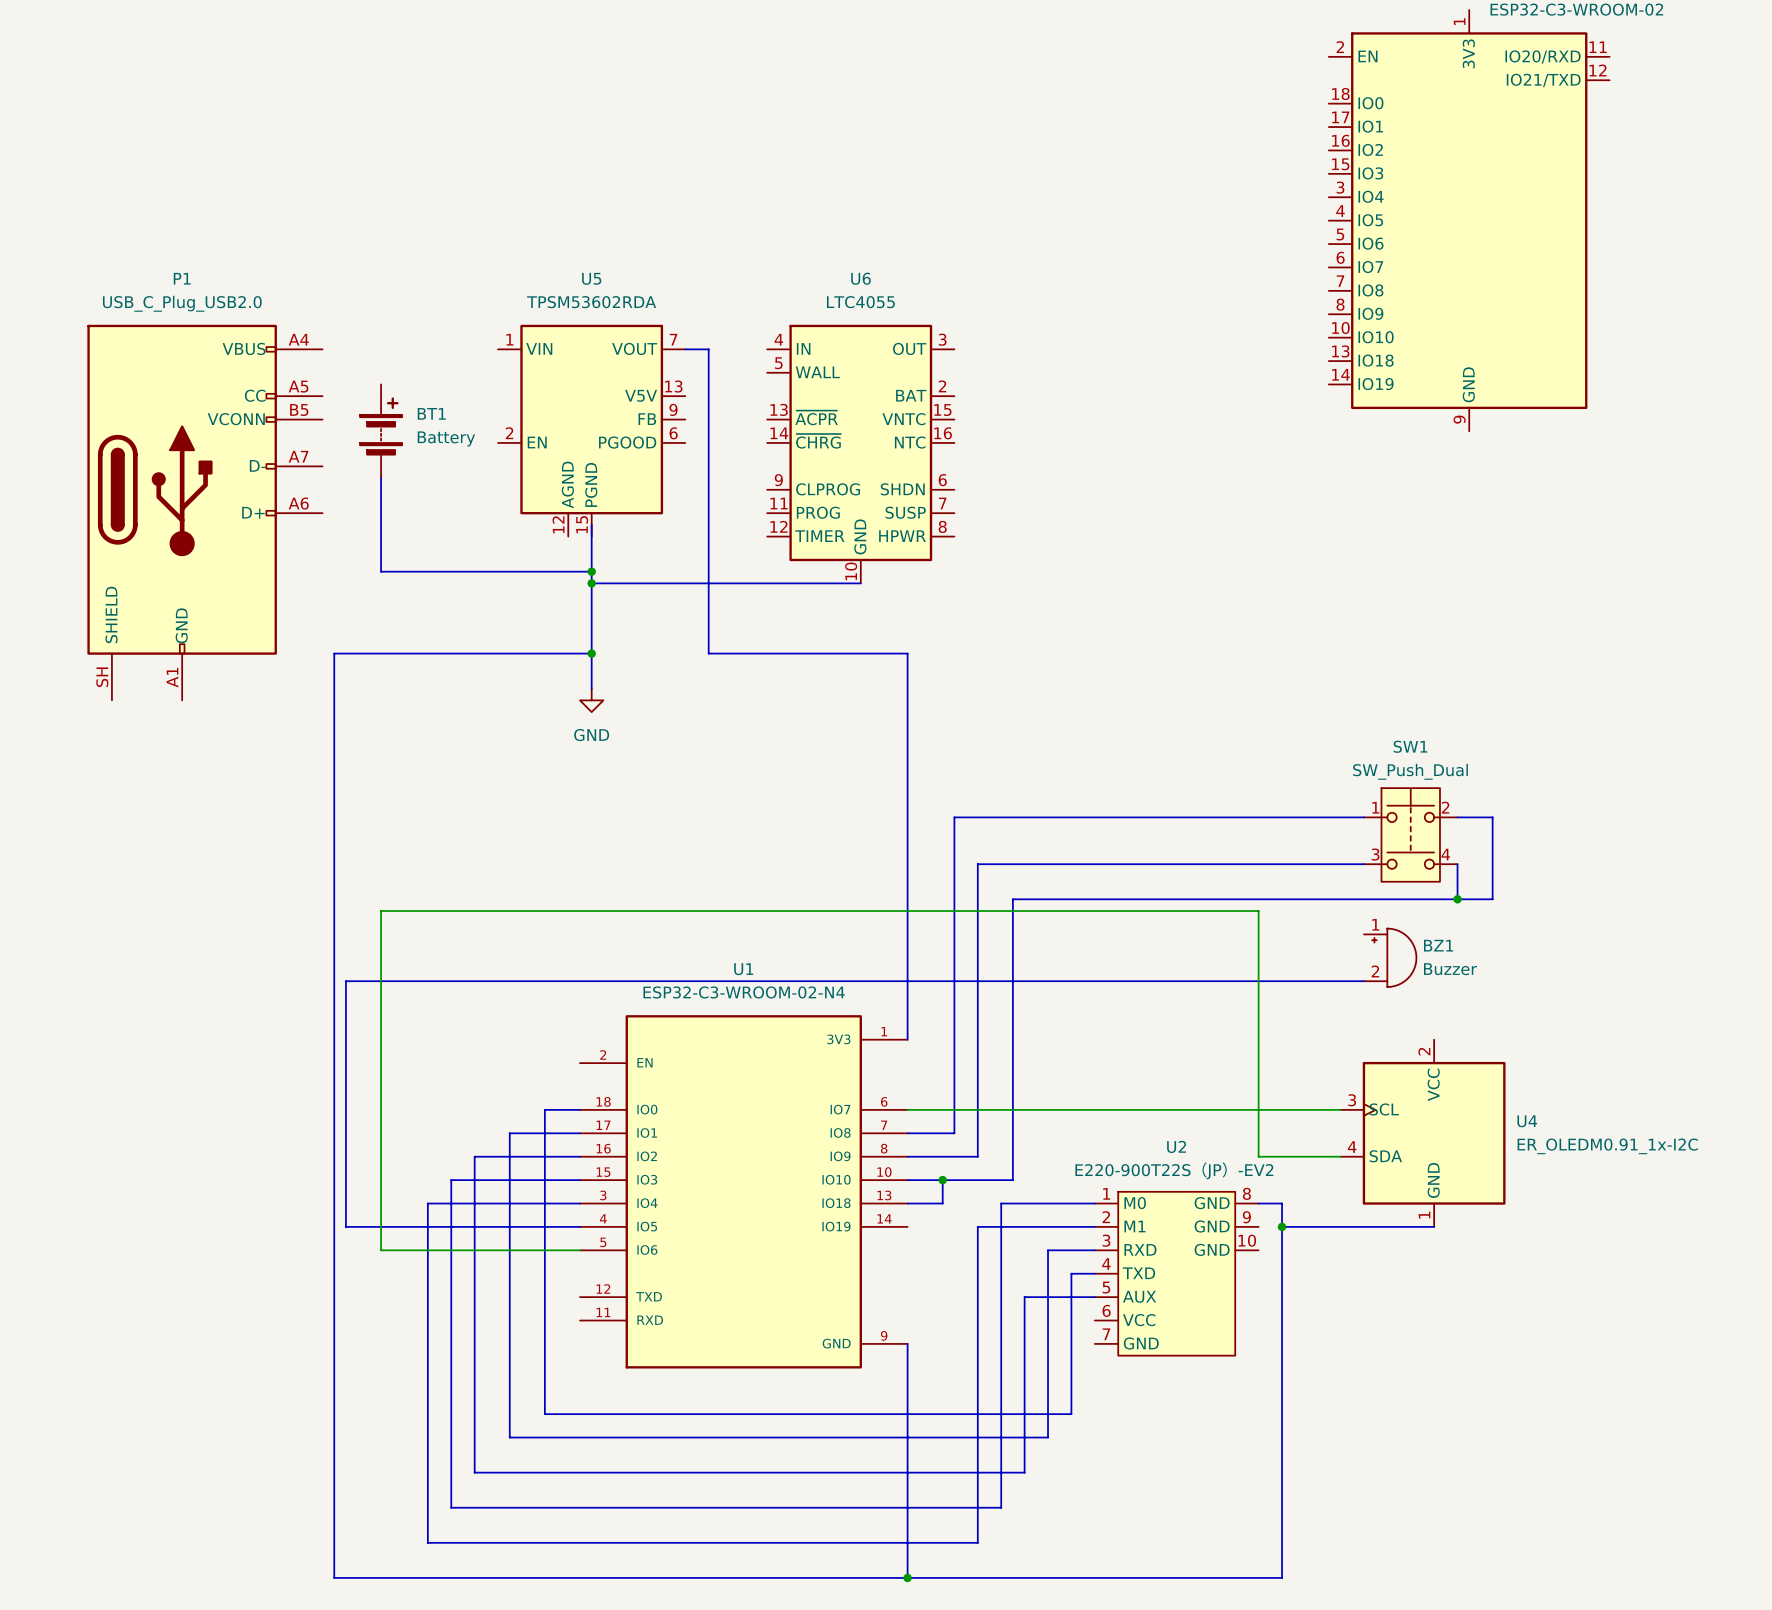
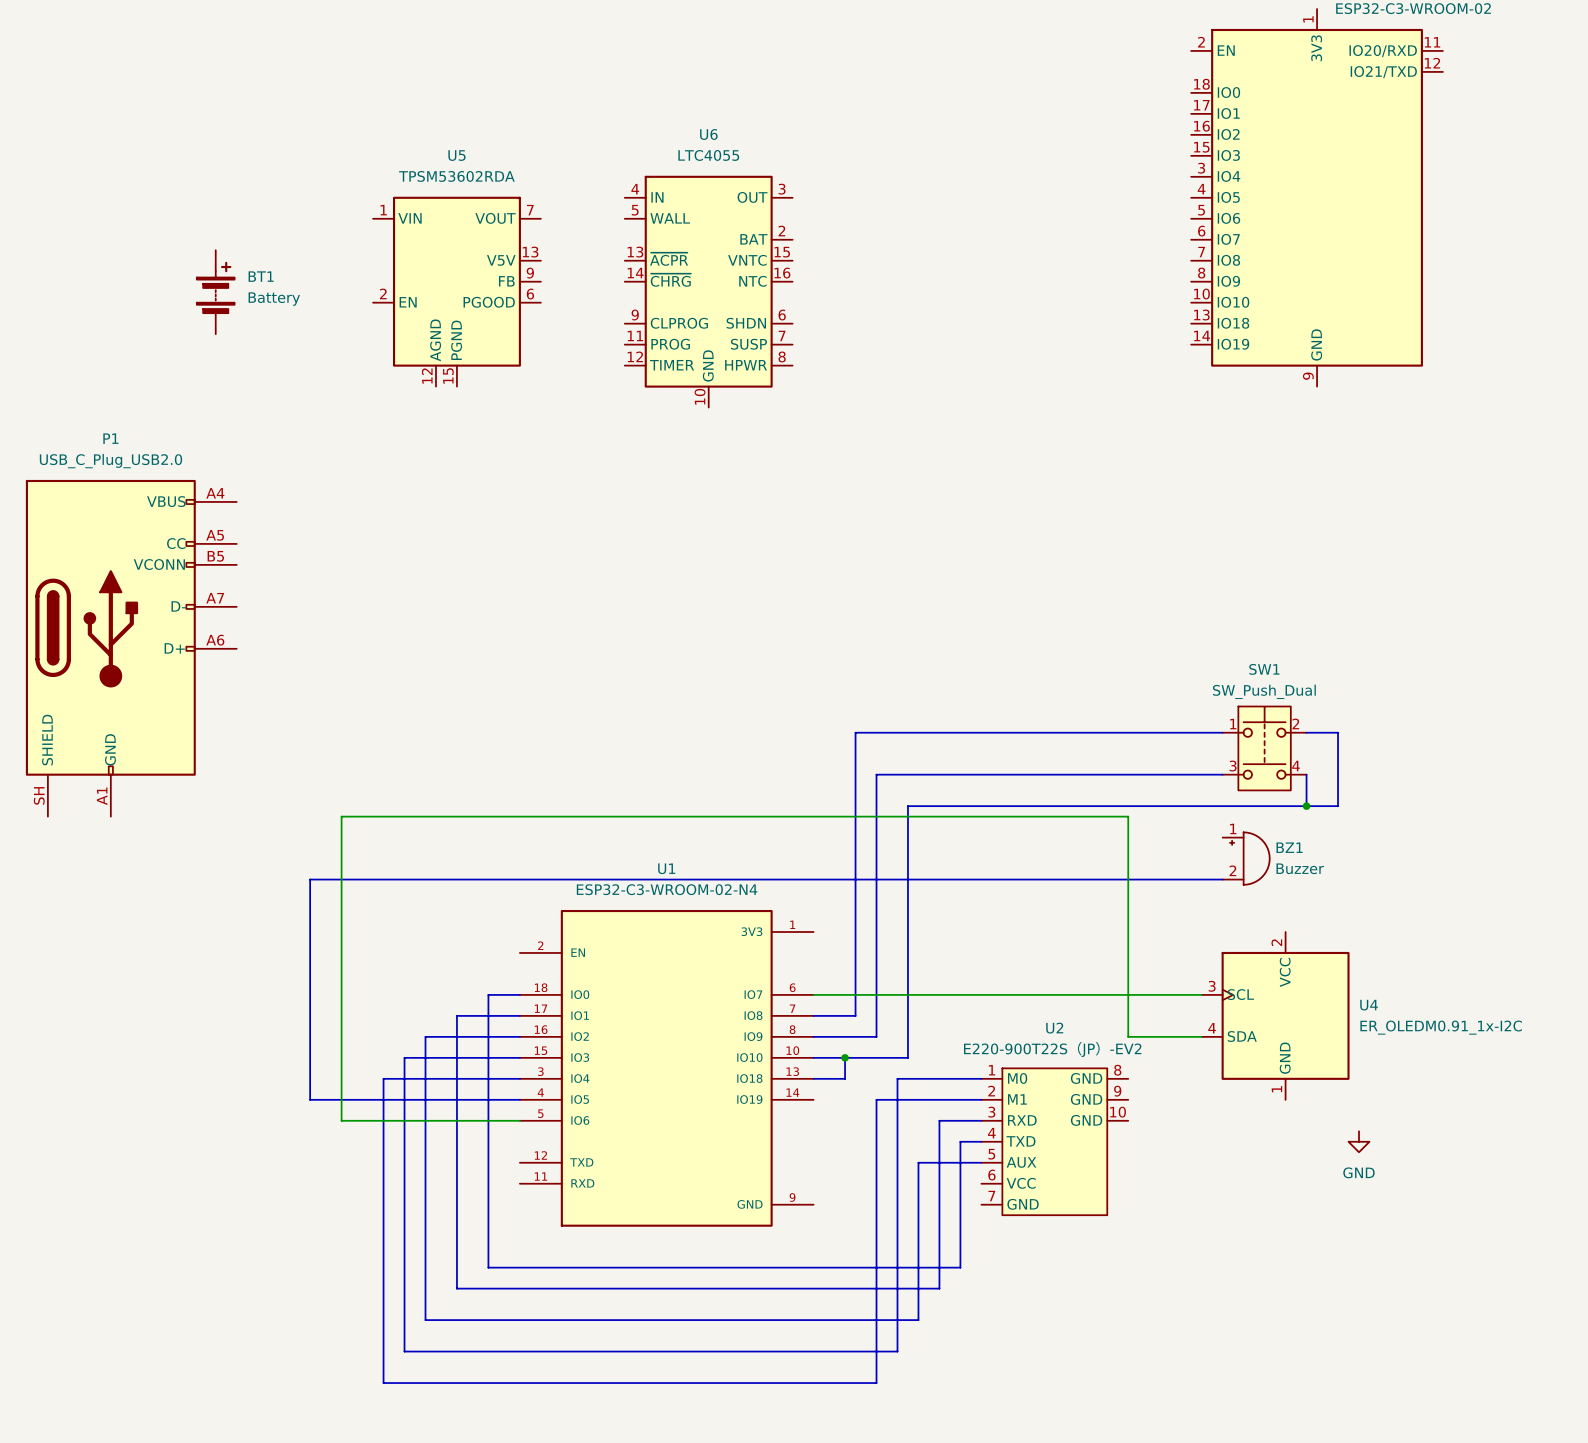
bus: (685, 349) (708, 349) (708, 653) (907, 653) (907, 1039) -> none
U5 position: (591, 430) -> (456, 291)
BT1 position: (381, 431) -> (215, 292)
U6 position: (860, 454) -> (708, 291)
bus: (381, 478) (381, 571) (591, 571) -> none
P1 position: (204, 512) -> (131, 648)
bus: (591, 524) (591, 688) -> none
junction: (591, 571) -> none
bus: (591, 583) (860, 583) -> none
junction: (591, 583) -> none
bus: (591, 653) (334, 653) (334, 1577) (1282, 1577) (1282, 1203) (1258, 1203) -> none
junction: (591, 653) -> none
power symbol: GND (591, 700) -> none
bus: (1282, 1226) (1434, 1226) -> none
junction: (1282, 1226) -> none
power symbol: none -> GND (1358, 1141)
bus: (907, 1343) (907, 1577) -> none
junction: (907, 1577) -> none

